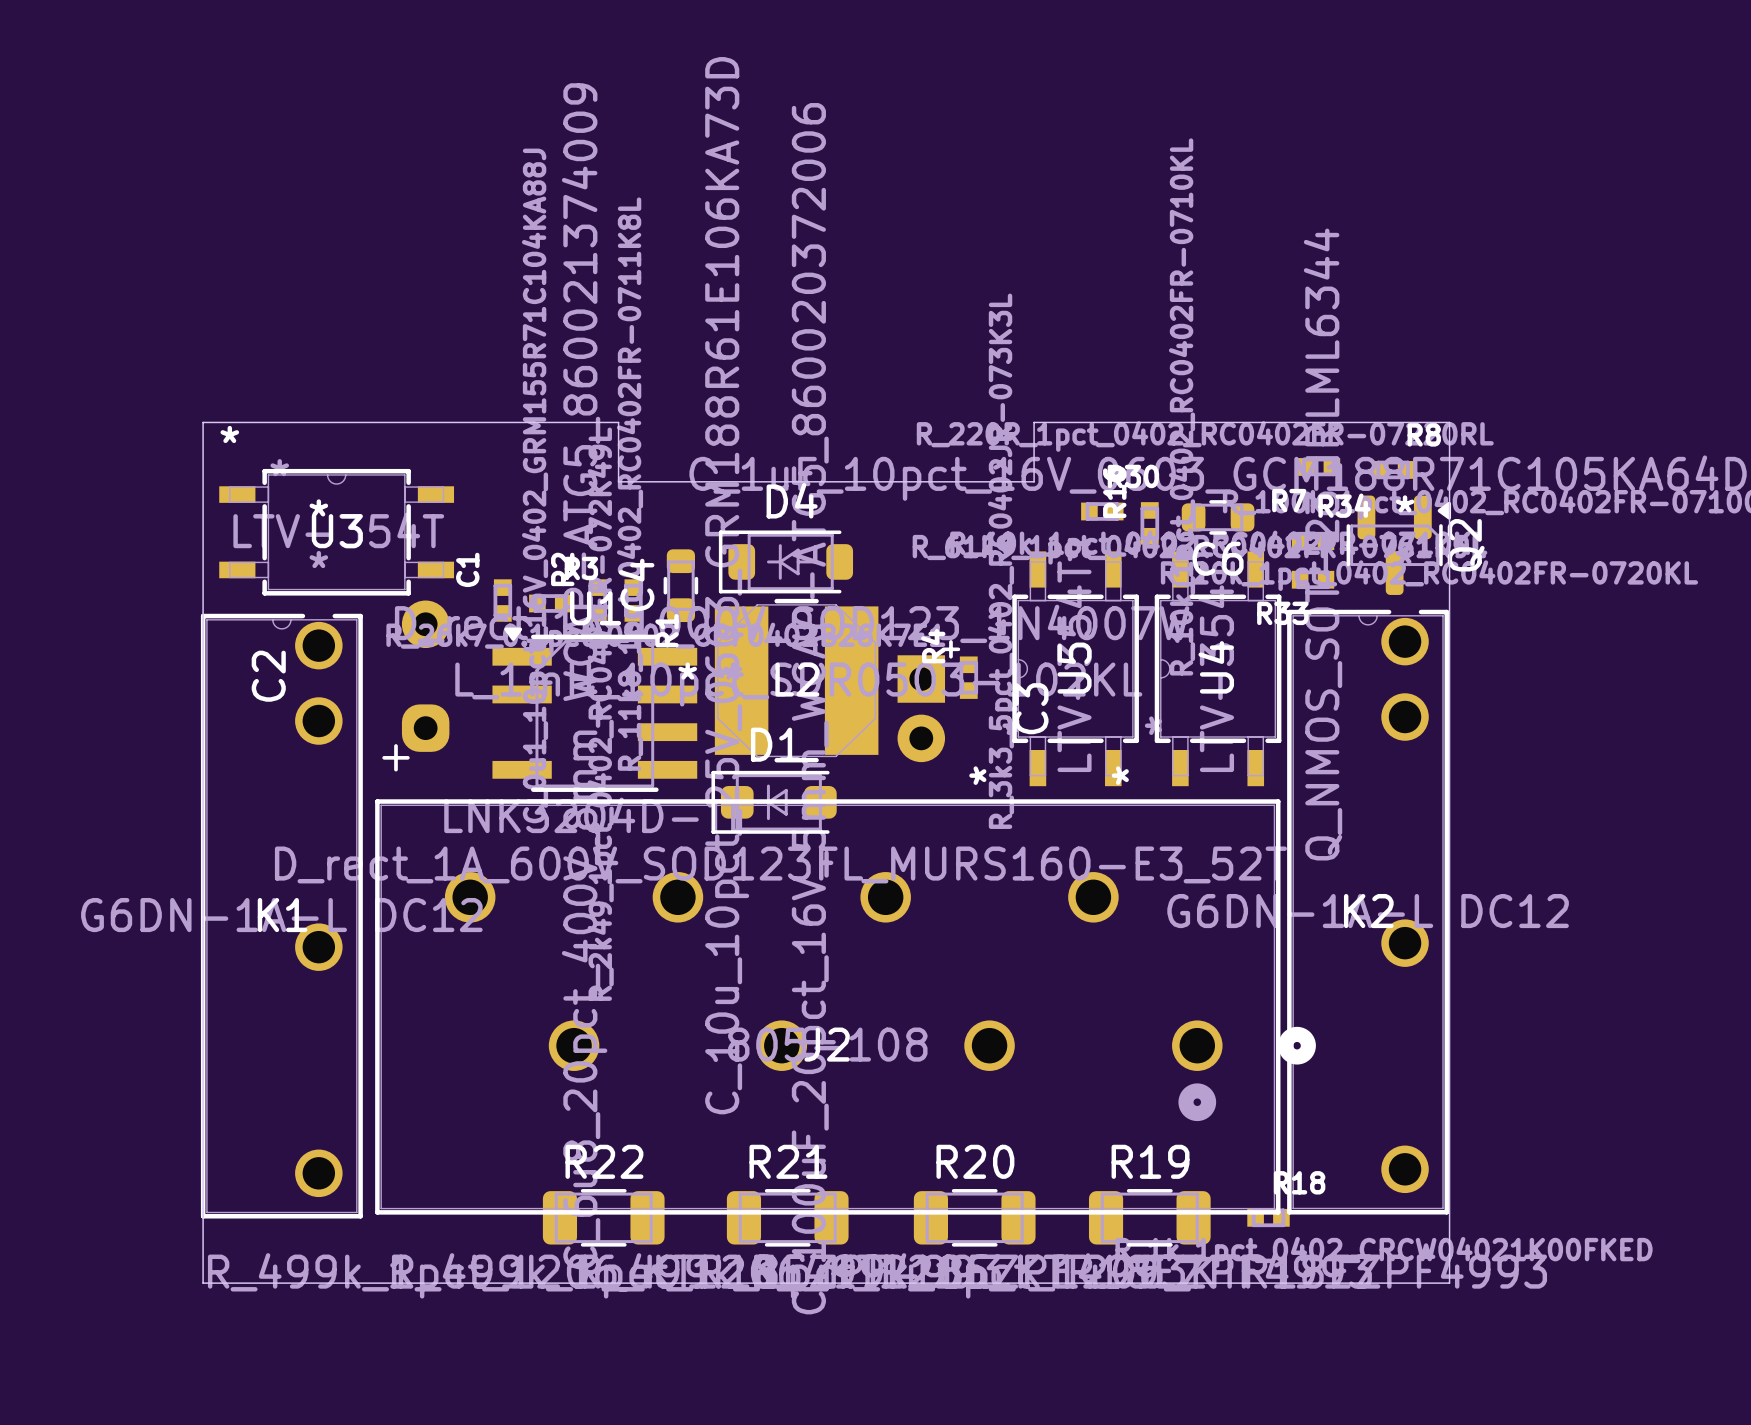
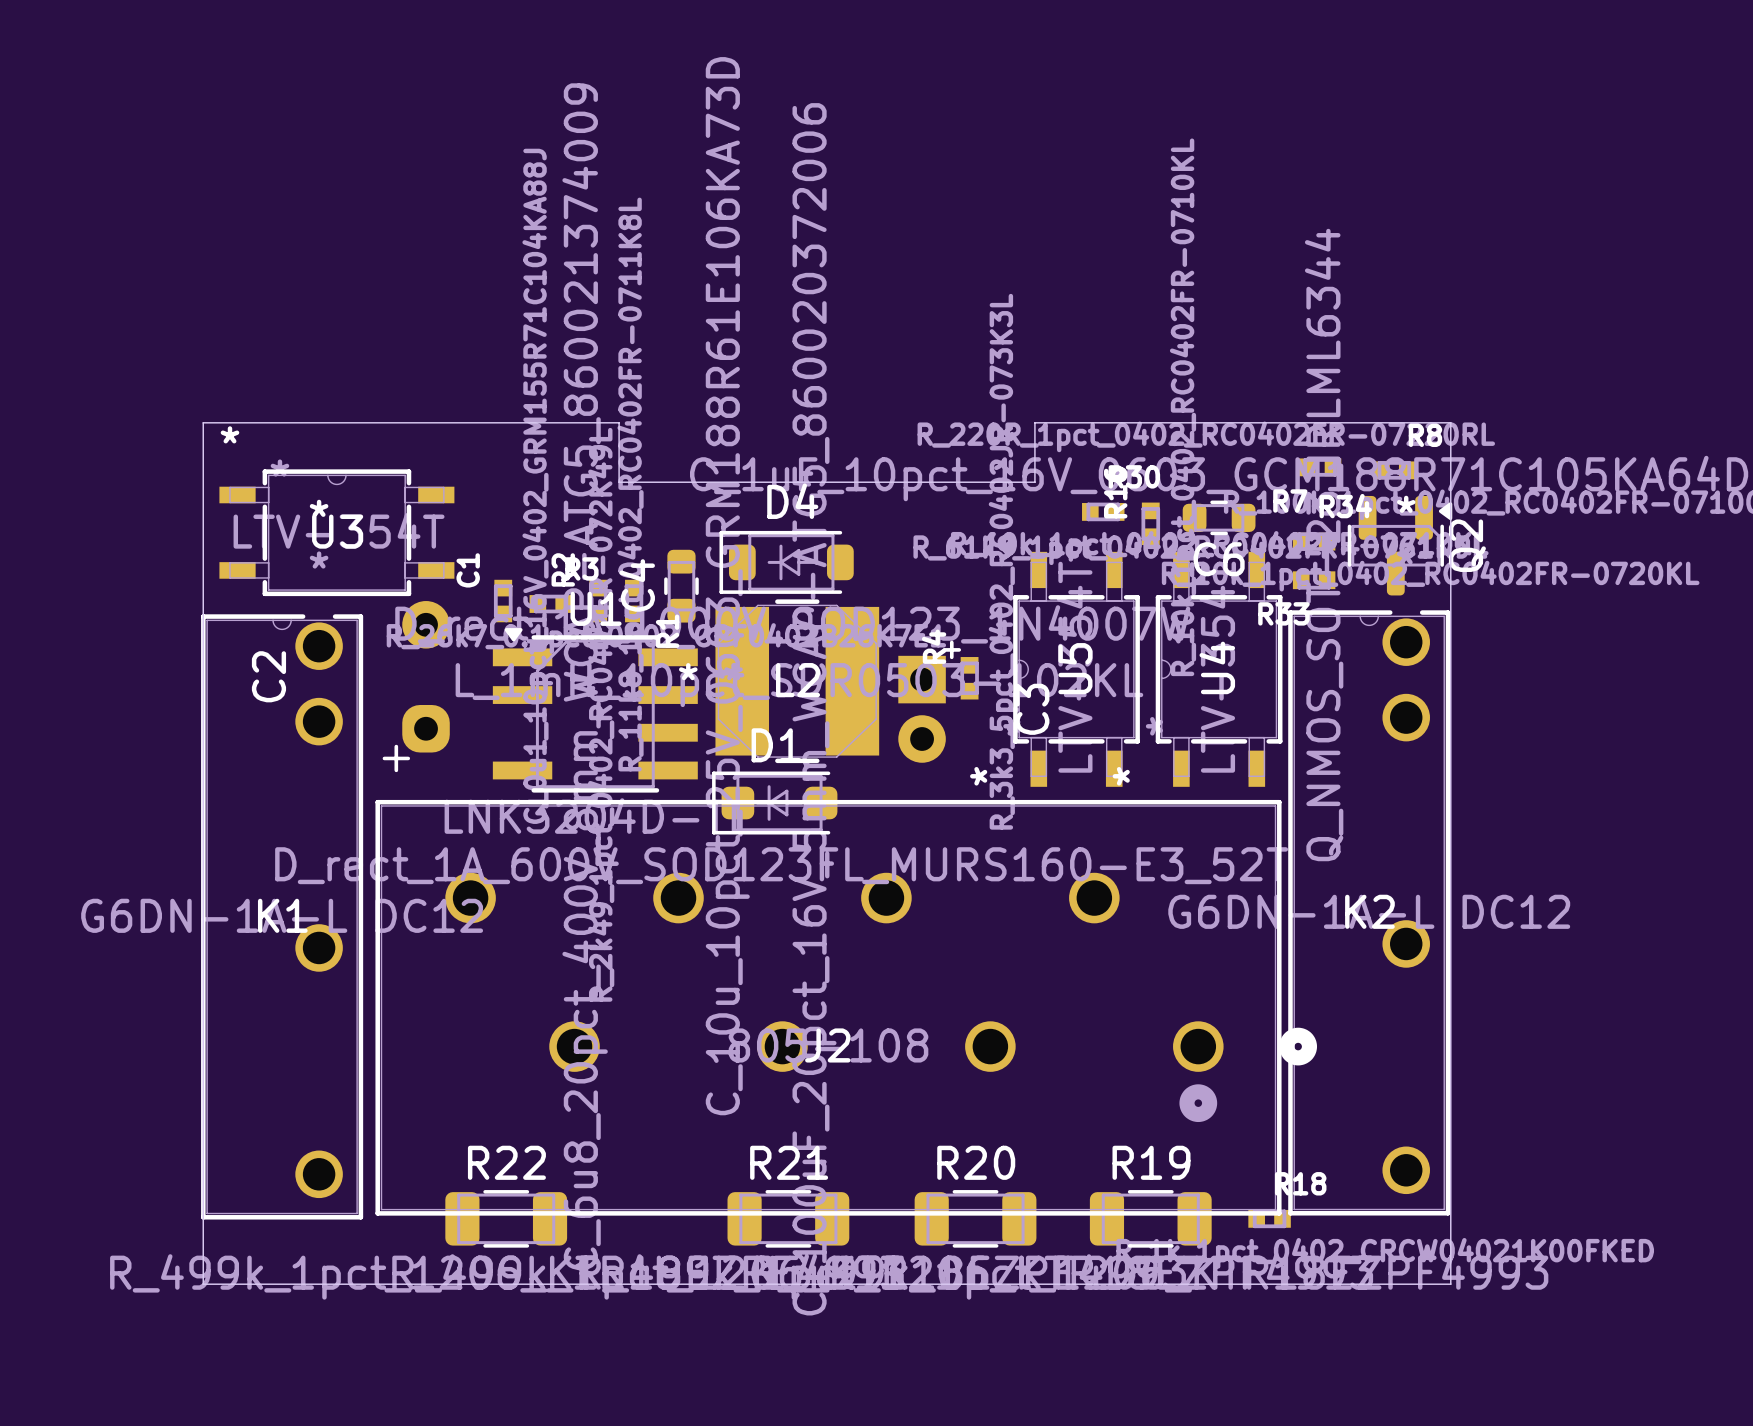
R22 position: (603, 1217) -> (506, 1218)

